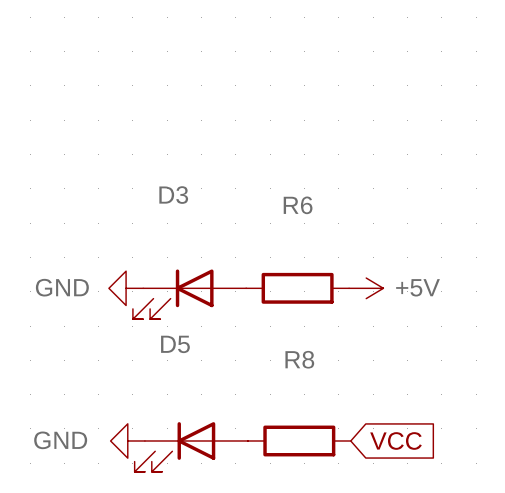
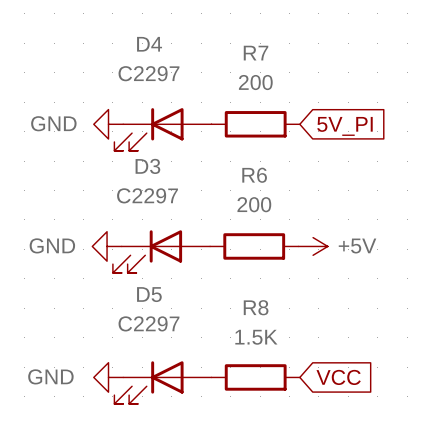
power symbol: none -> GND (108, 124)
R7: none -> 200 (255, 124)
global label: none -> 5V_PI (344, 126)
D4: none -> C2297 (162, 129)
D3 value: none -> C2297 (147, 195)
R6 value: none -> 200 (254, 204)
D5 value: none -> C2297 (148, 323)
R8 value: none -> 1.5K (256, 337)

